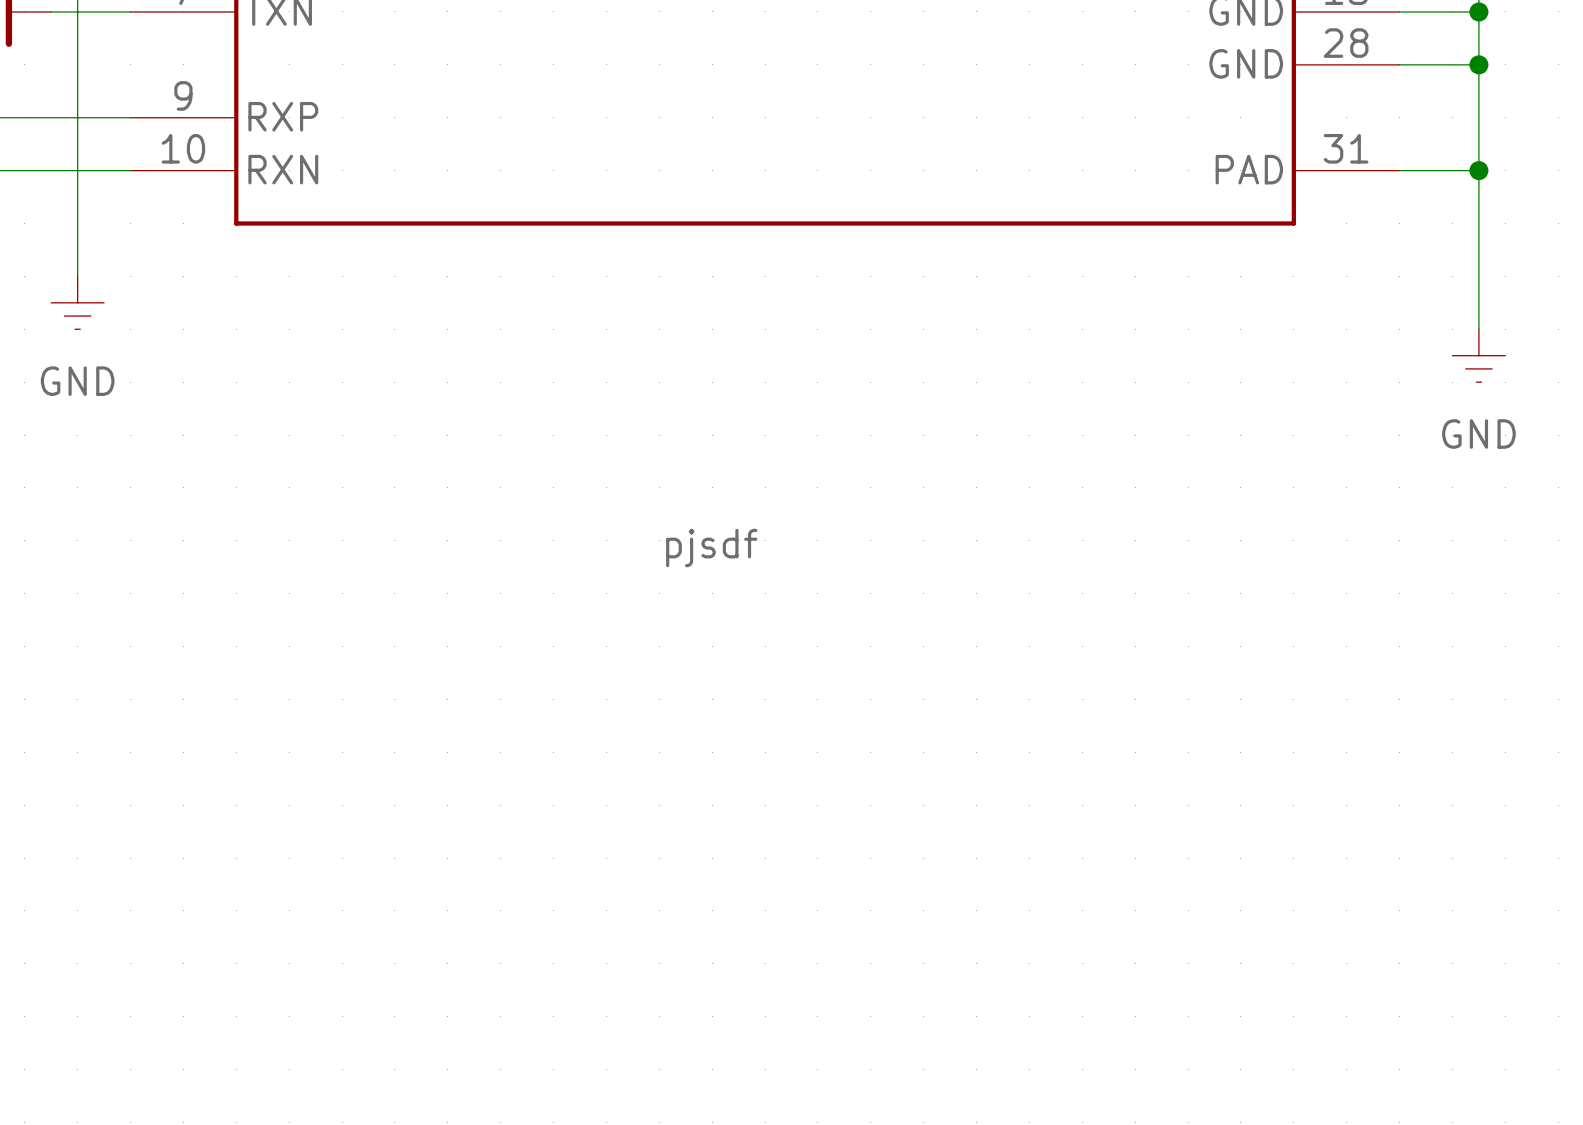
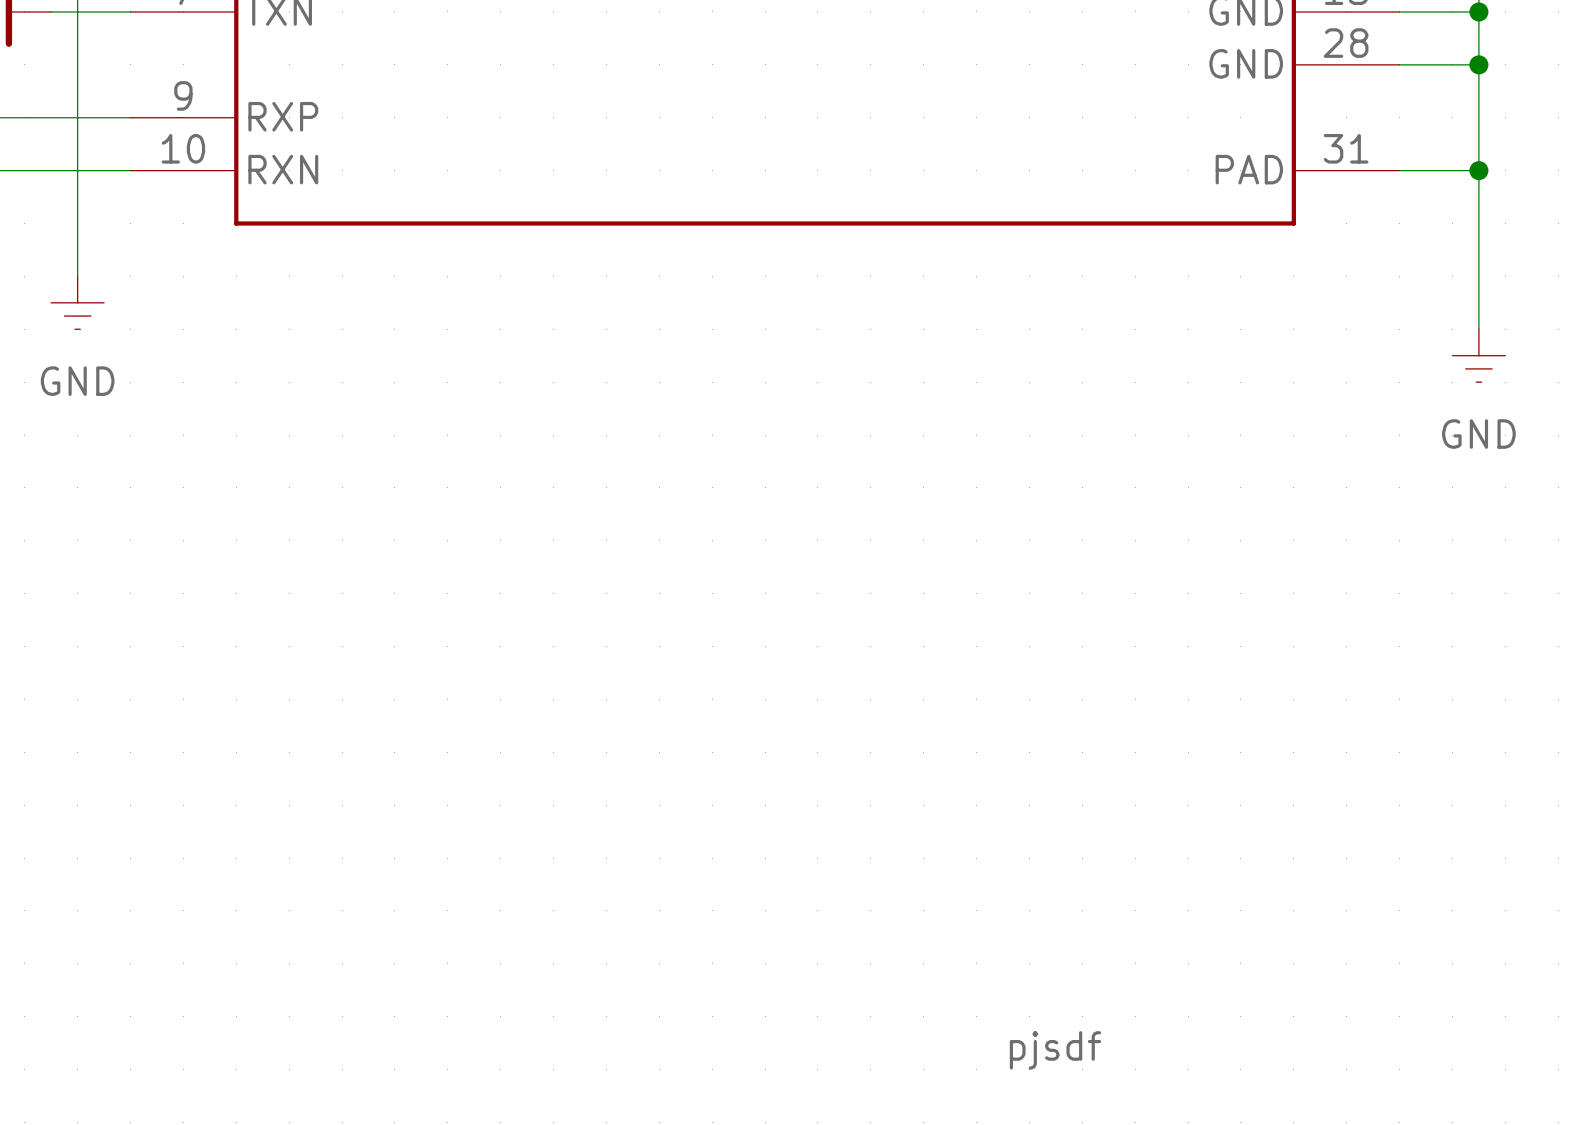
label: pjsdf (711, 548) -> none
label: none -> pjsdf (1055, 1050)

